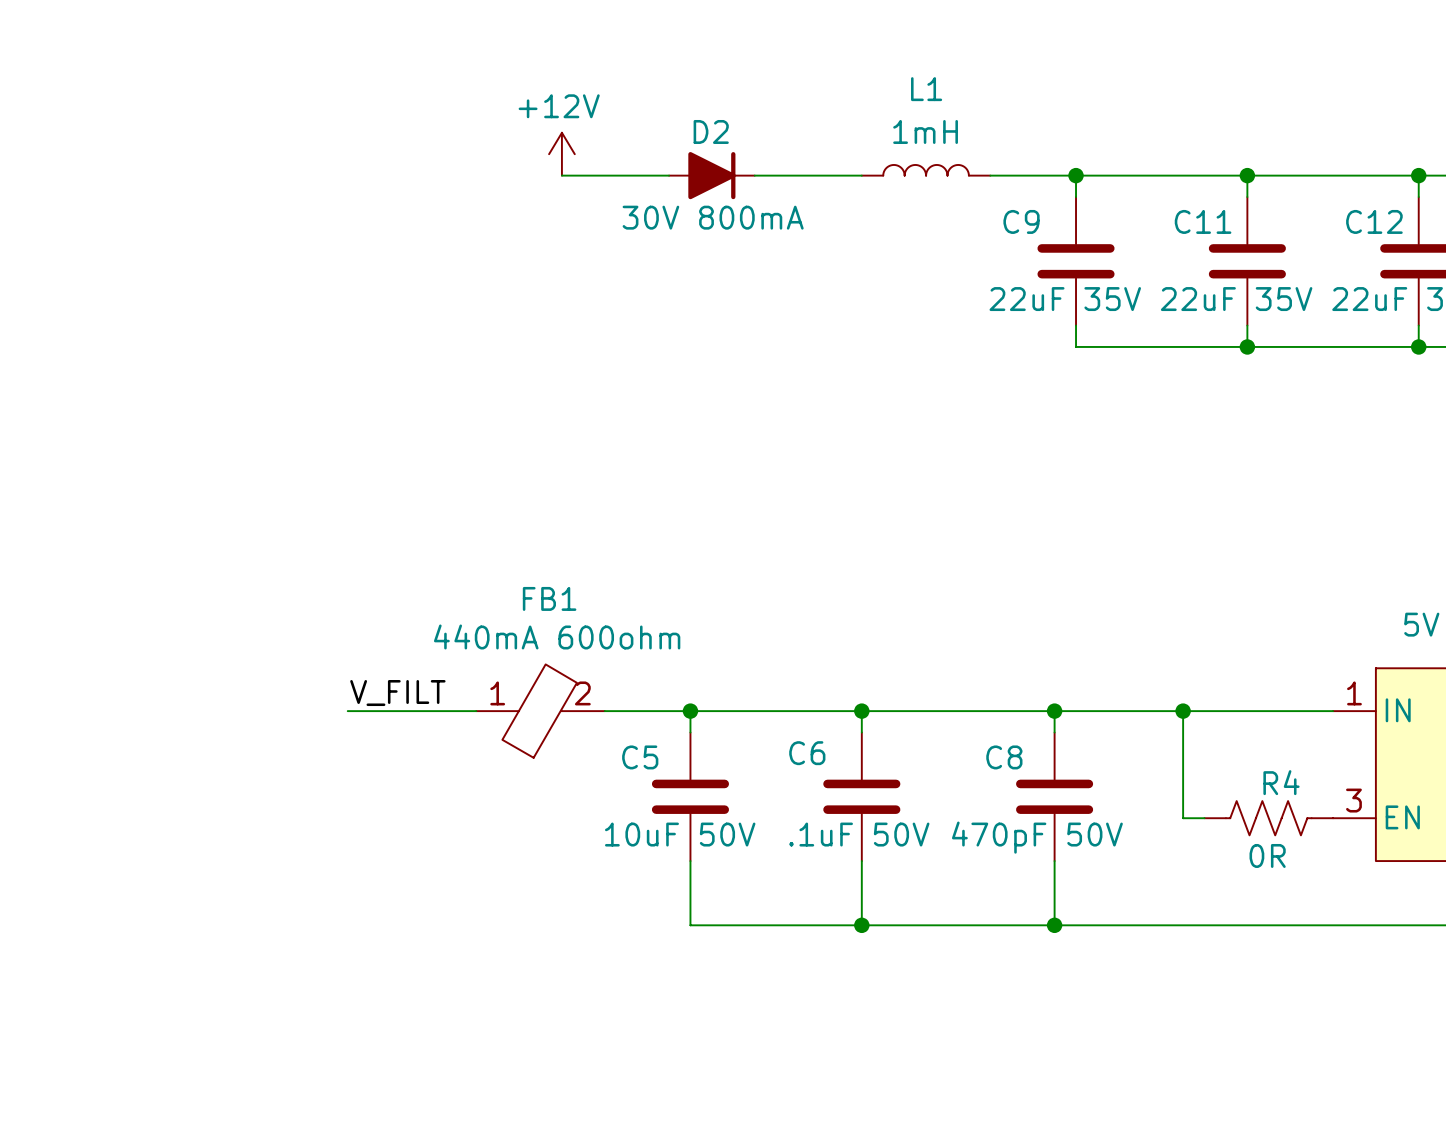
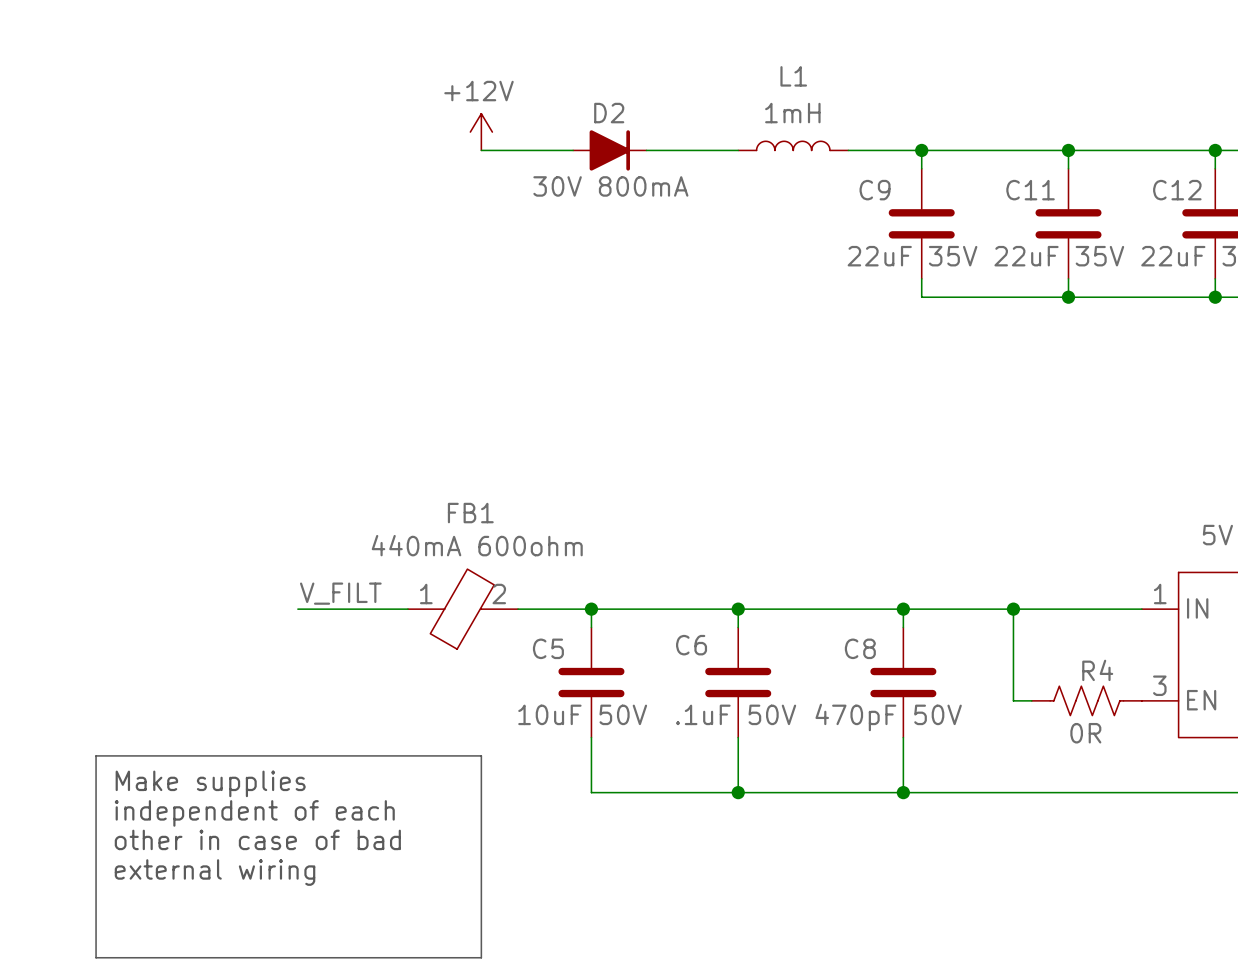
line: none -> (96, 755) (481, 755) (481, 957) (96, 957) (96, 755)
text: none -> Make supplies (210, 783)
text: none -> independent of each (254, 813)
text: none -> other in case of bad (257, 839)
text: none -> external wiring (215, 872)

